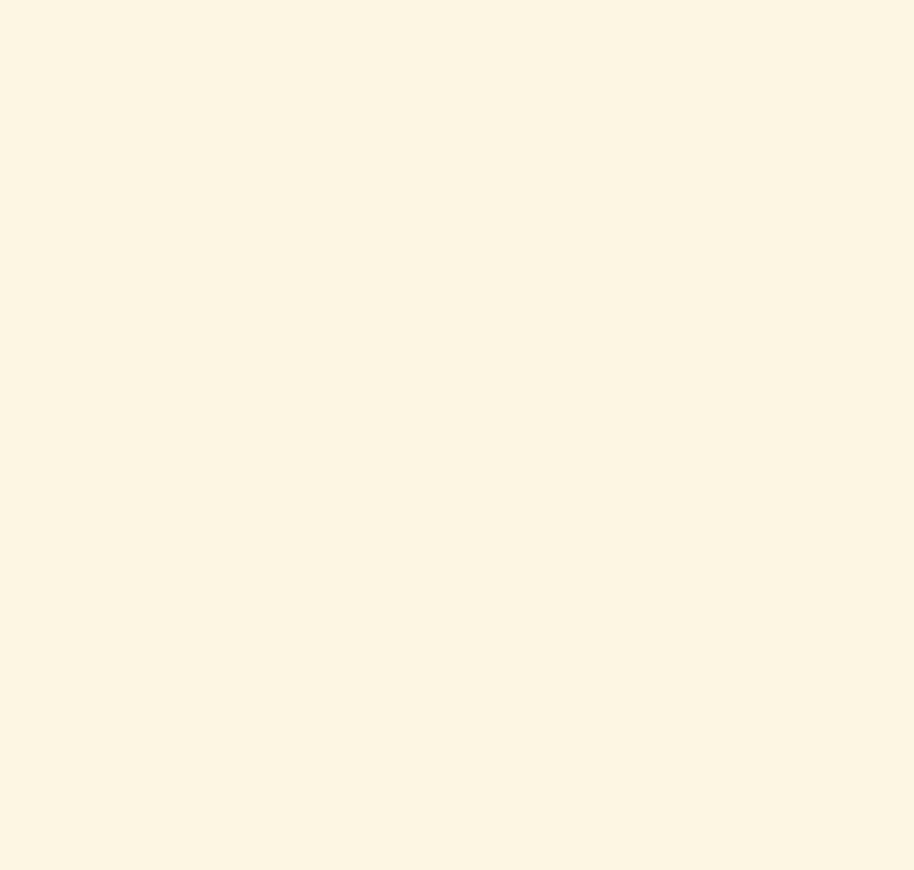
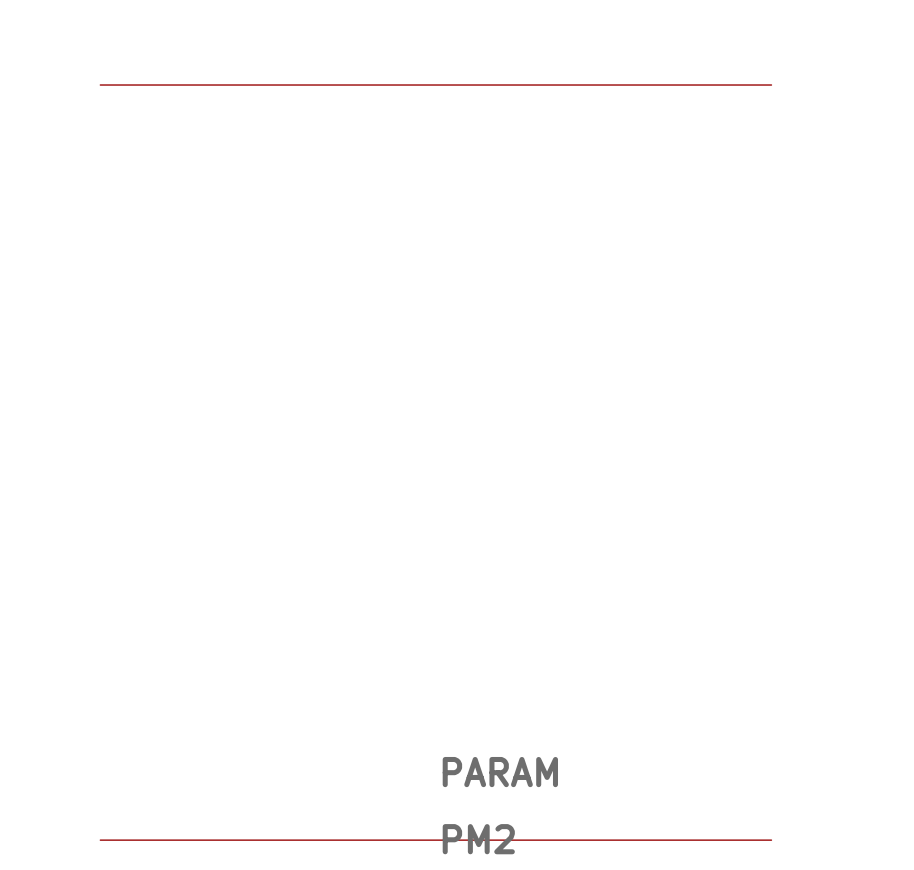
part: none -> (435, 85)
PM2: none -> PARAM (435, 840)

